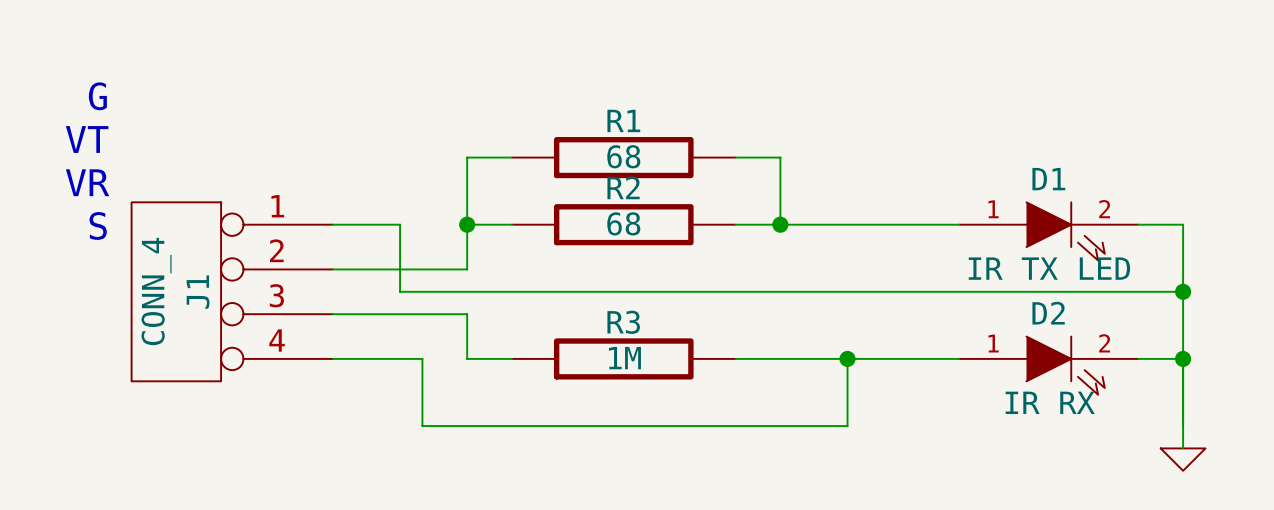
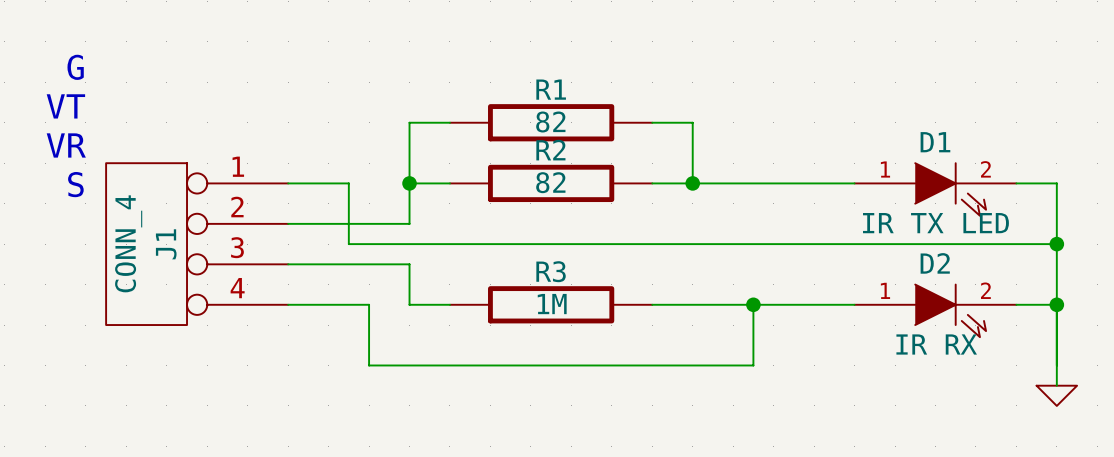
R1 value: 68 (623, 156) -> 82 (550, 121)
R2 value: 68 (623, 223) -> 82 (550, 182)

